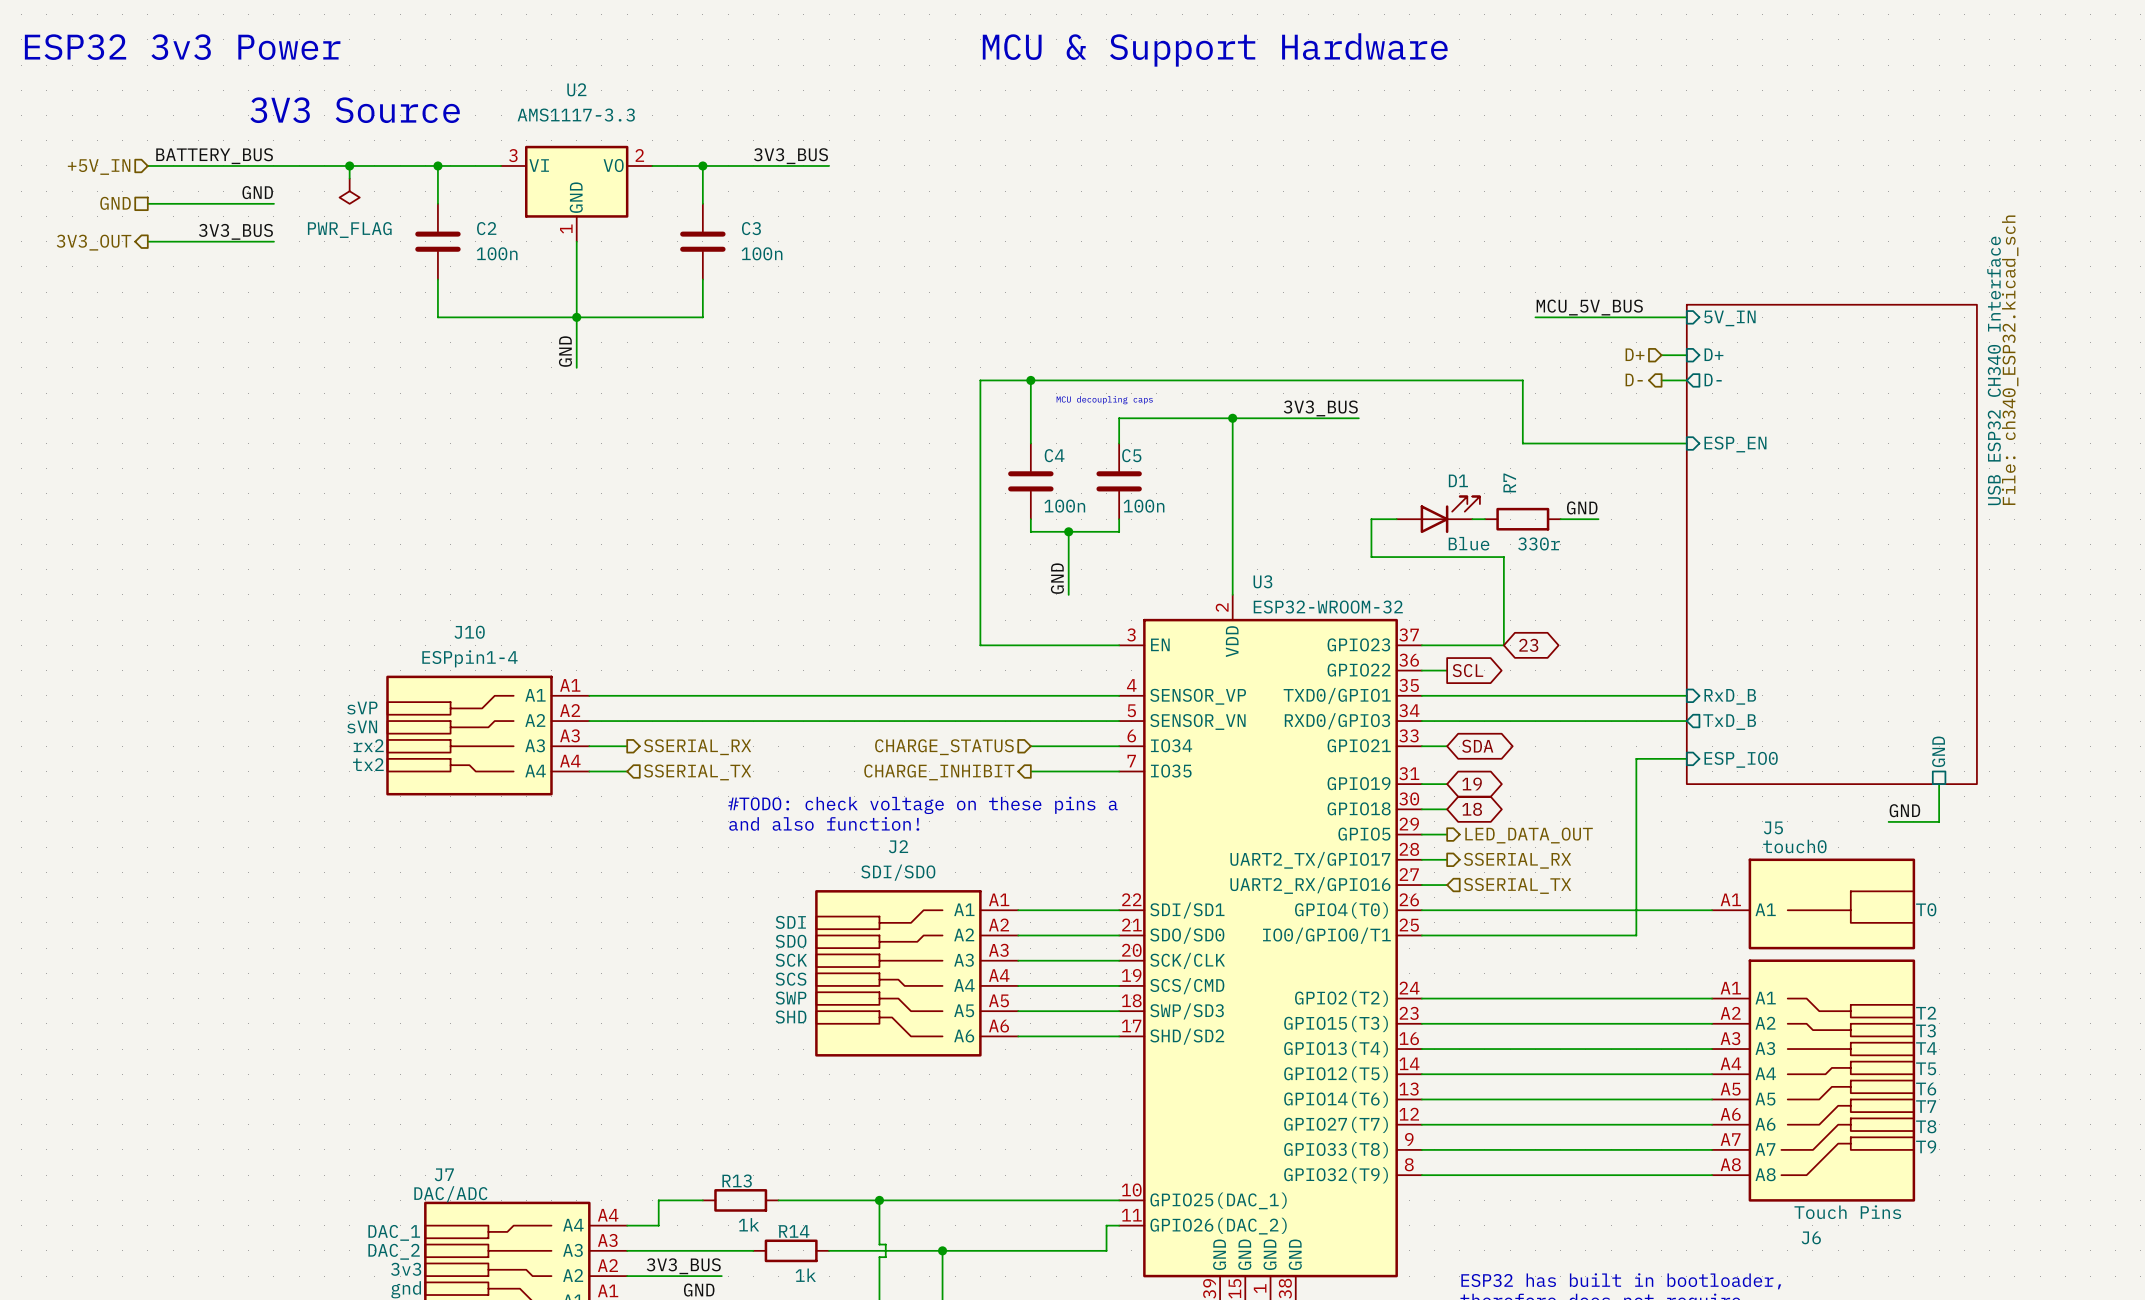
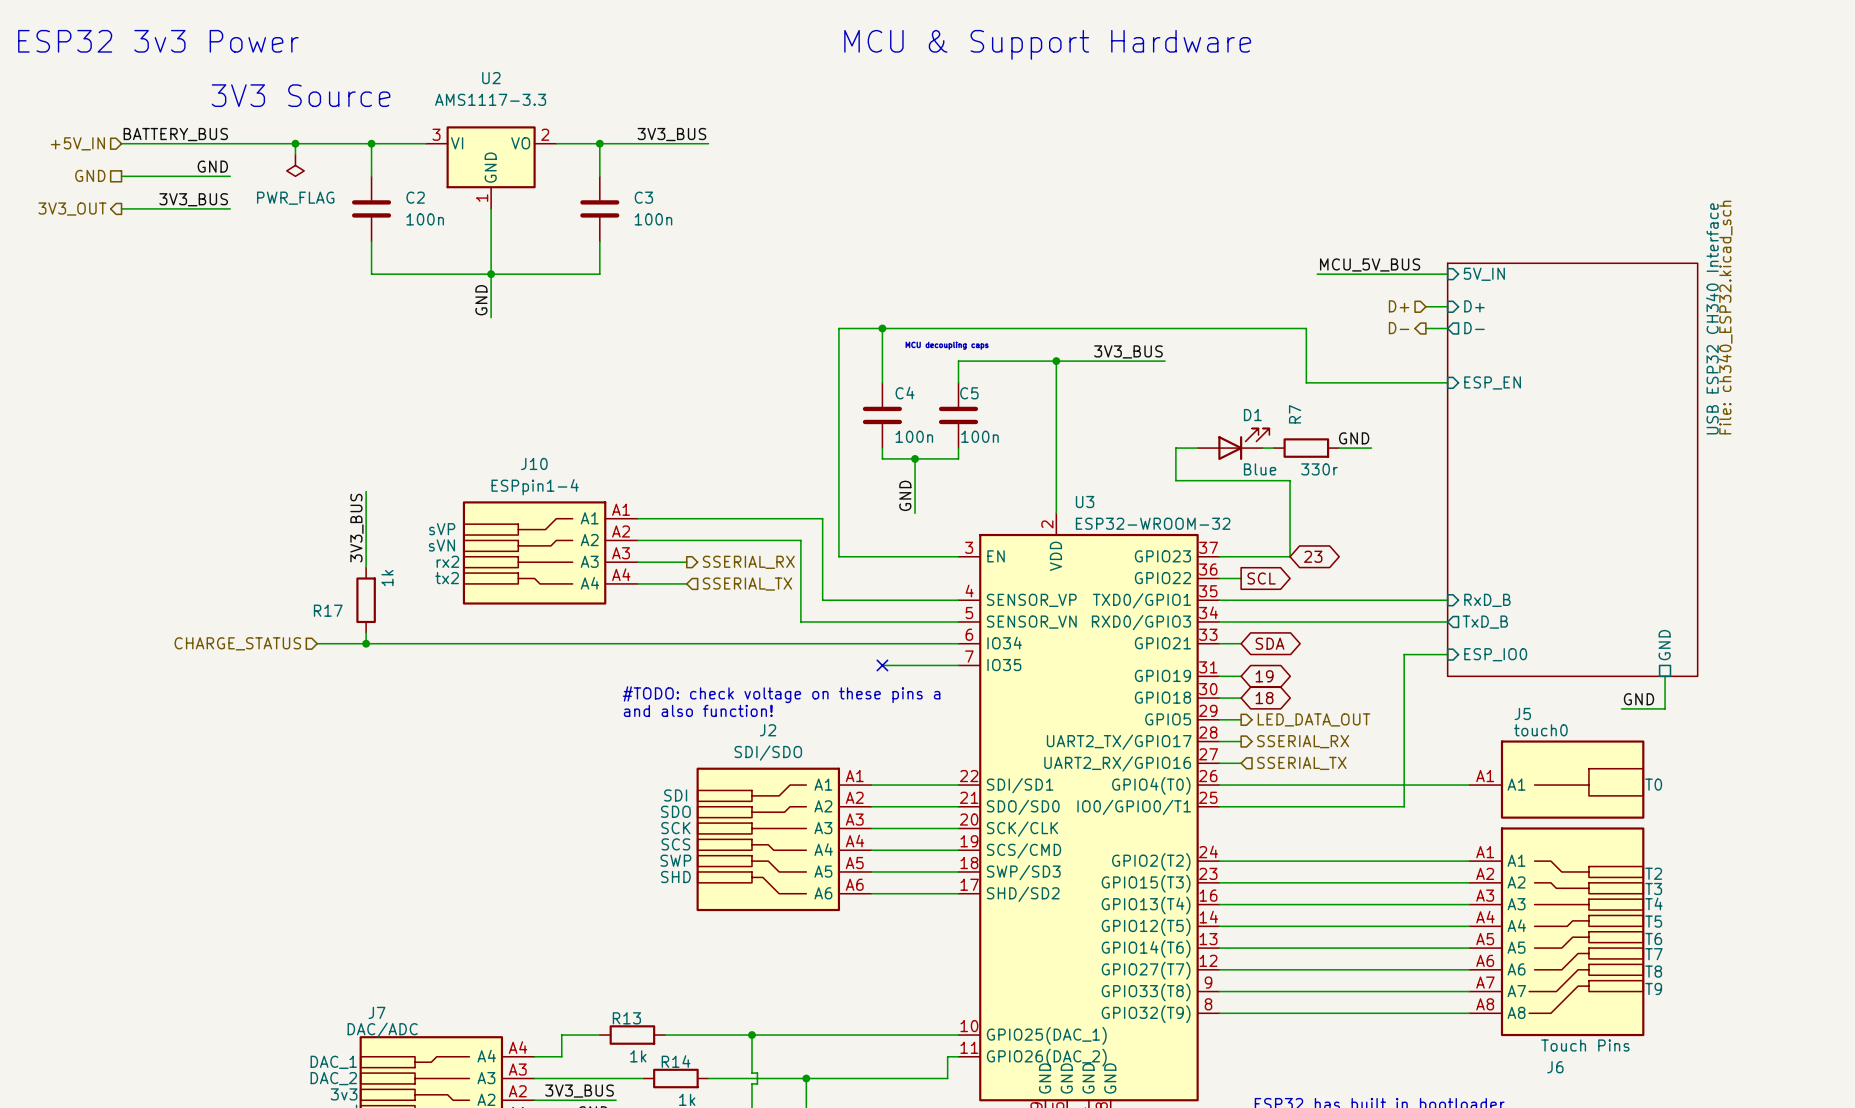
wire: none -> (366, 491) (366, 567)
label: none -> 3V3_BUS (356, 528)
wire: none -> (637, 562) (686, 562)
wire: none -> (637, 583) (686, 583)
R17: none -> 1k (366, 600)
wire: (589, 695) (961, 695) -> (637, 518) (822, 518) (822, 600)
wire: (589, 721) (936, 721) -> (637, 540) (800, 540) (800, 621)
J10 position: (487, 735) -> (550, 552)
junction: none -> (366, 643)
wire: none -> (534, 643) (882, 643)
hierarchical label: none -> CHARGE_STATUS (237, 643)
hierarchical label position: SSERIAL_RX (697, 747) -> SSERIAL_RX (748, 562)
hierarchical label: CHARGE_STATUS (944, 747) -> none
wire: (589, 771) (627, 771) -> none
no-connect mark: none -> (882, 665)
hierarchical label position: SSERIAL_TX (697, 772) -> SSERIAL_TX (747, 584)
hierarchical label: CHARGE_INHIBIT (939, 772) -> none

